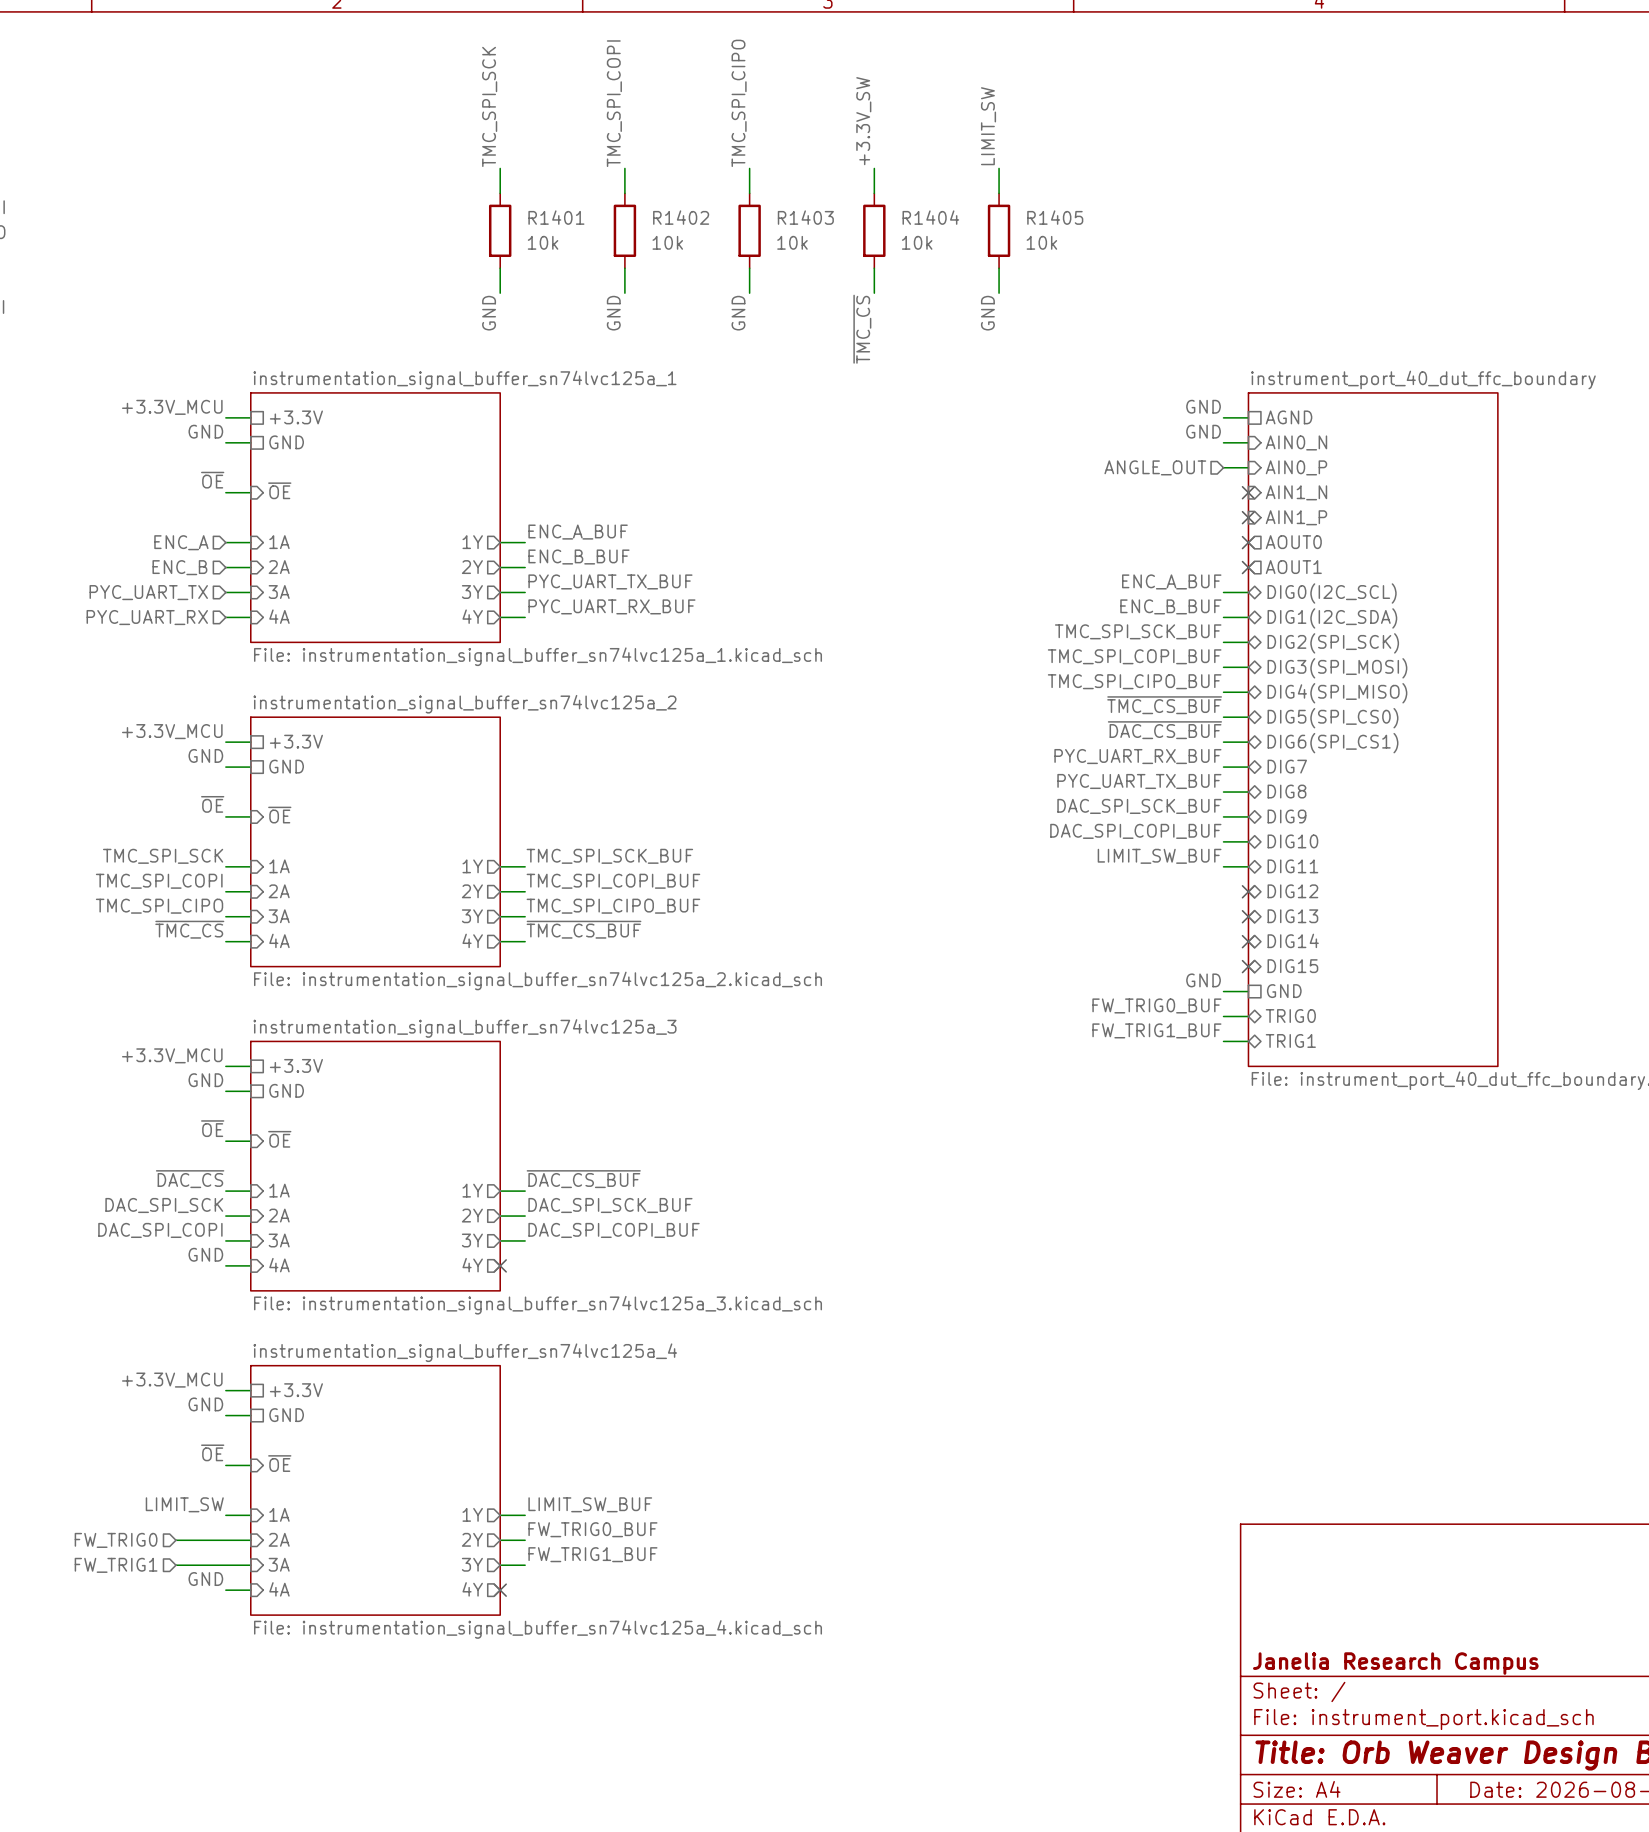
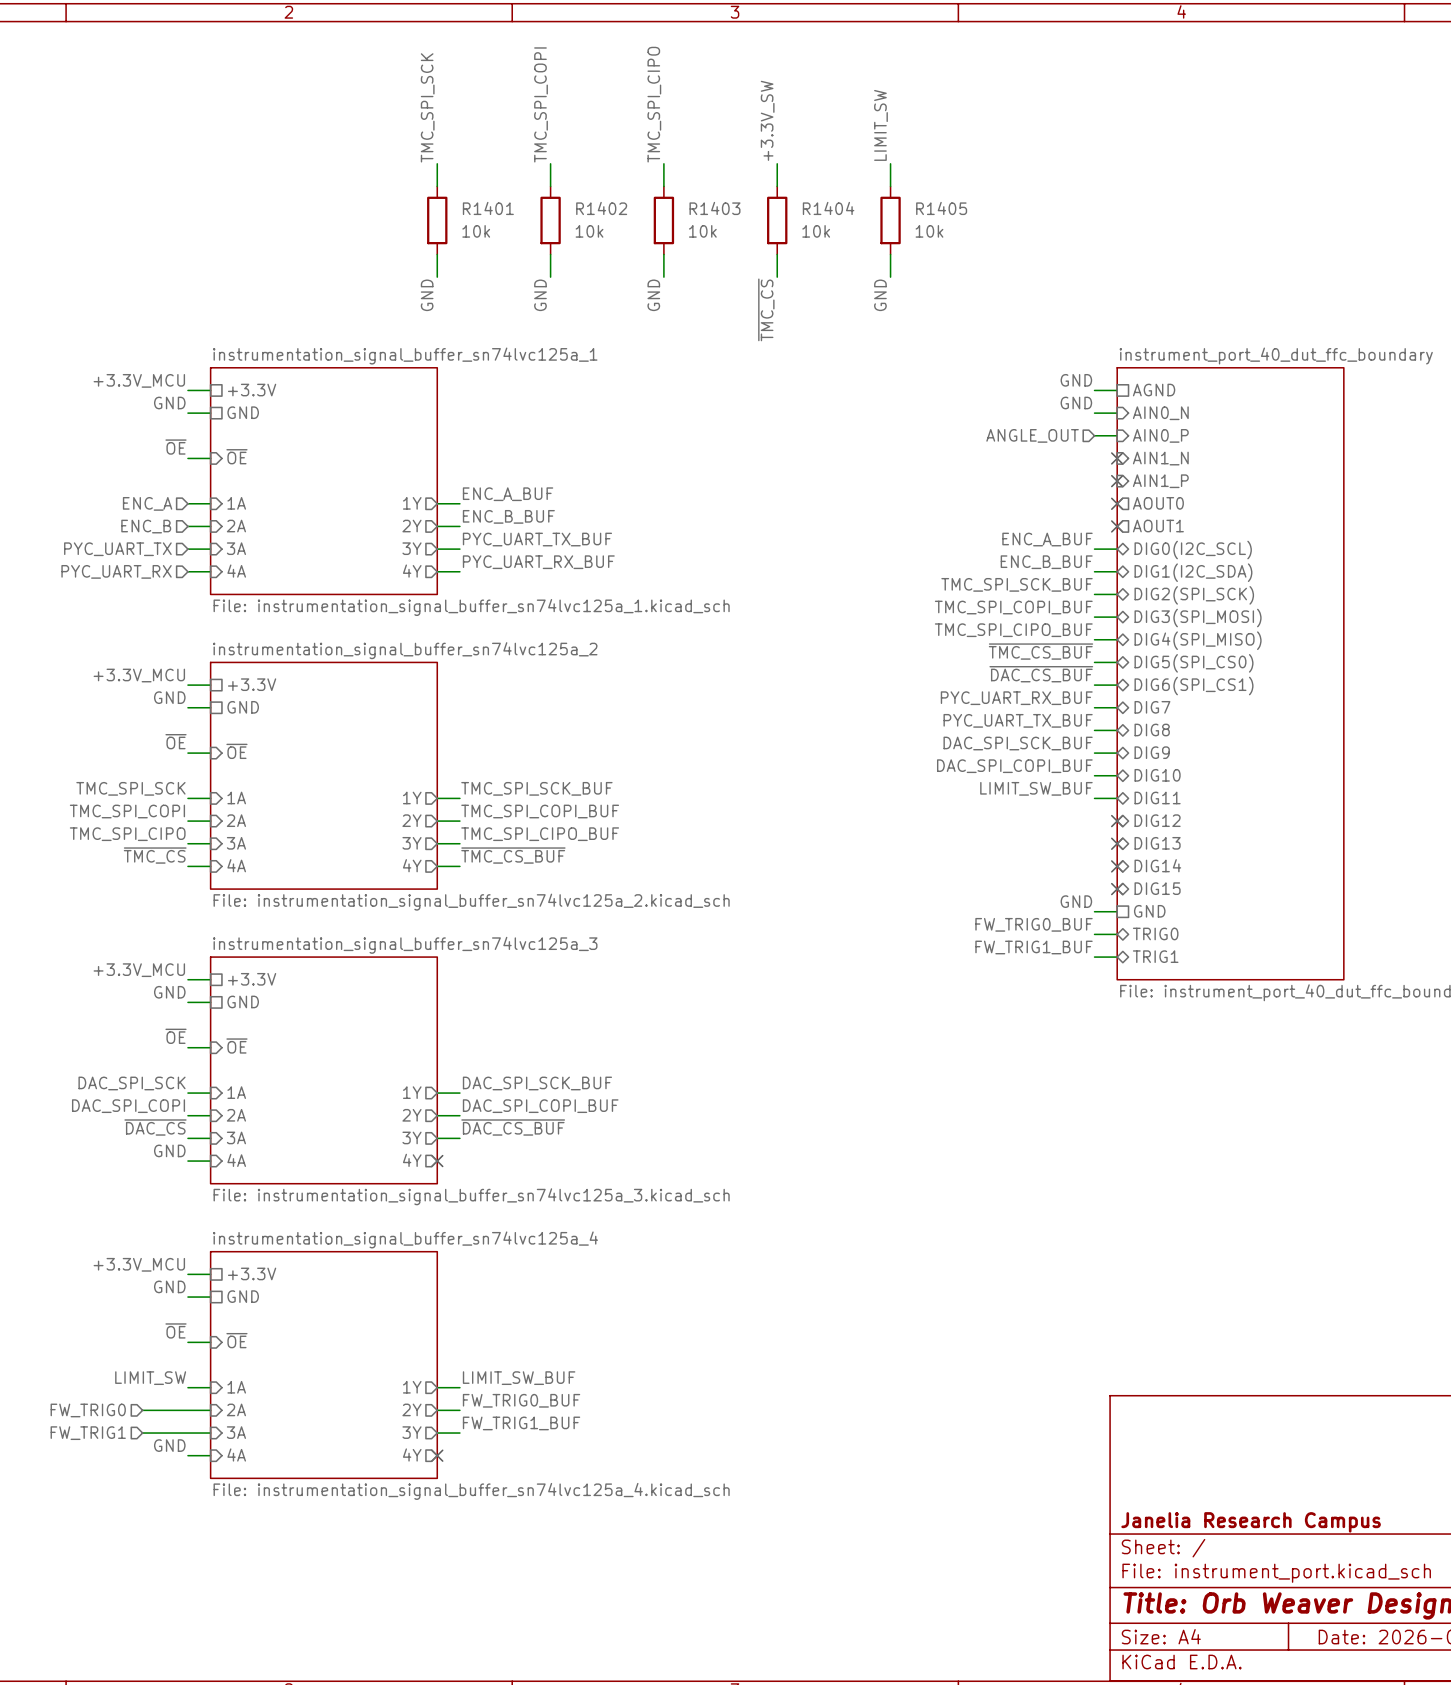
label: ~{DAC_CS} (190, 1179) -> DAC_SPI_SCK (132, 1083)
label: ~{DAC_CS_BUF} (583, 1179) -> DAC_SPI_SCK_BUF (537, 1083)
label: DAC_SPI_SCK (164, 1205) -> DAC_SPI_COPI (128, 1106)
label: DAC_SPI_SCK_BUF (610, 1205) -> DAC_SPI_COPI_BUF (540, 1106)
label: DAC_SPI_COPI (160, 1230) -> ~{DAC_CS} (155, 1127)
label: DAC_SPI_COPI_BUF (614, 1230) -> ~{DAC_CS_BUF} (513, 1127)

